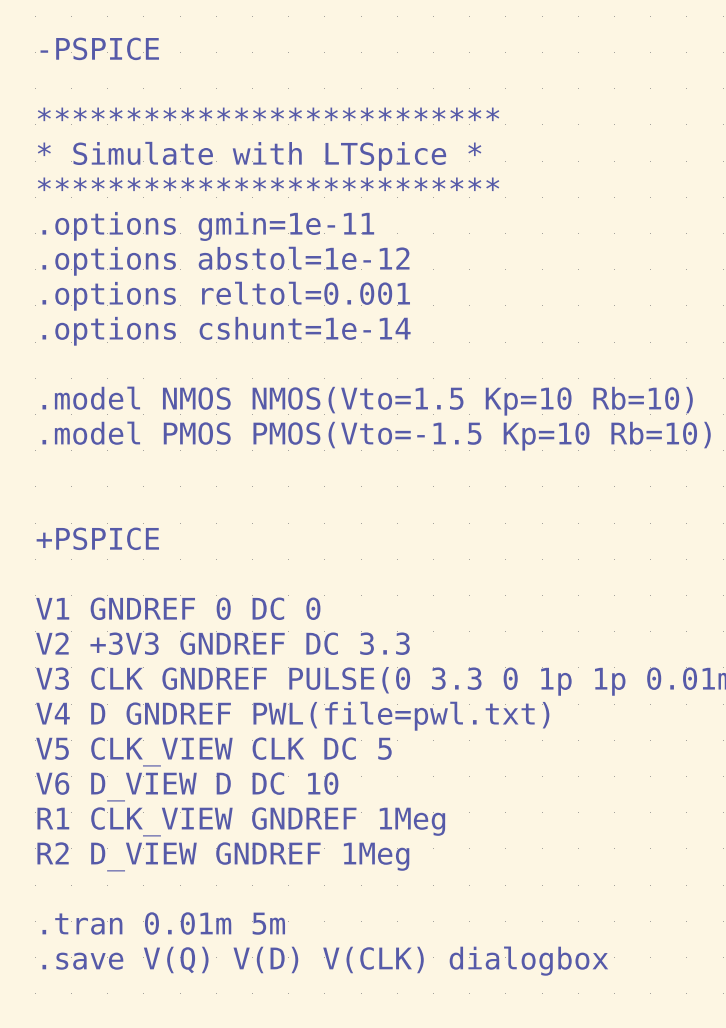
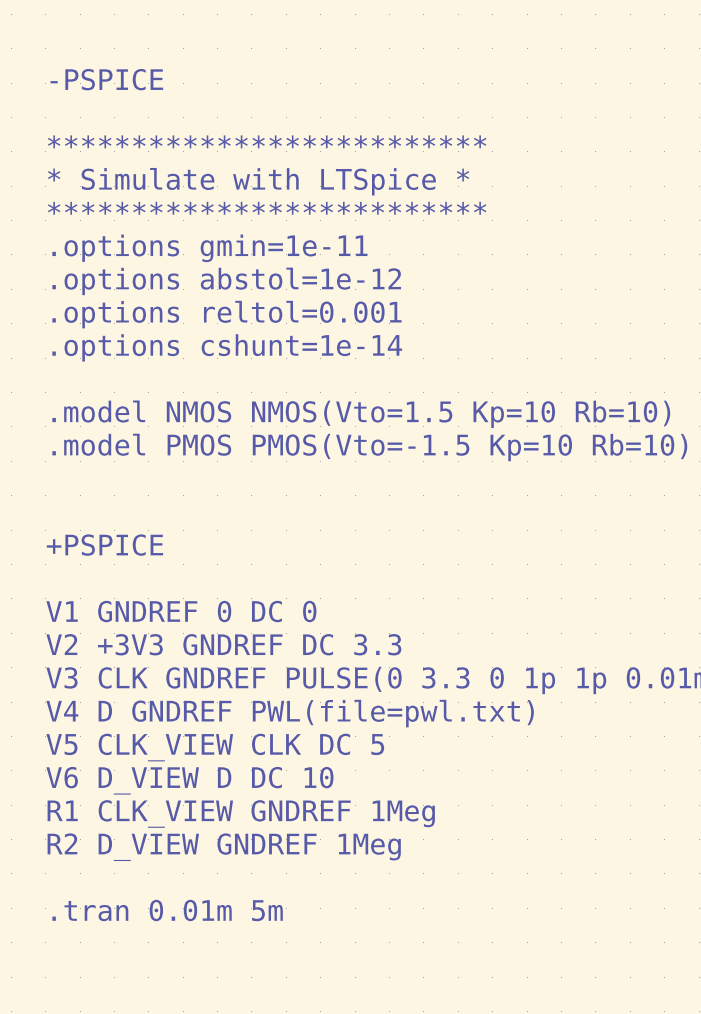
text: .save V(Q) V(D) V(CLK) dialogbox (325, 961) -> none

